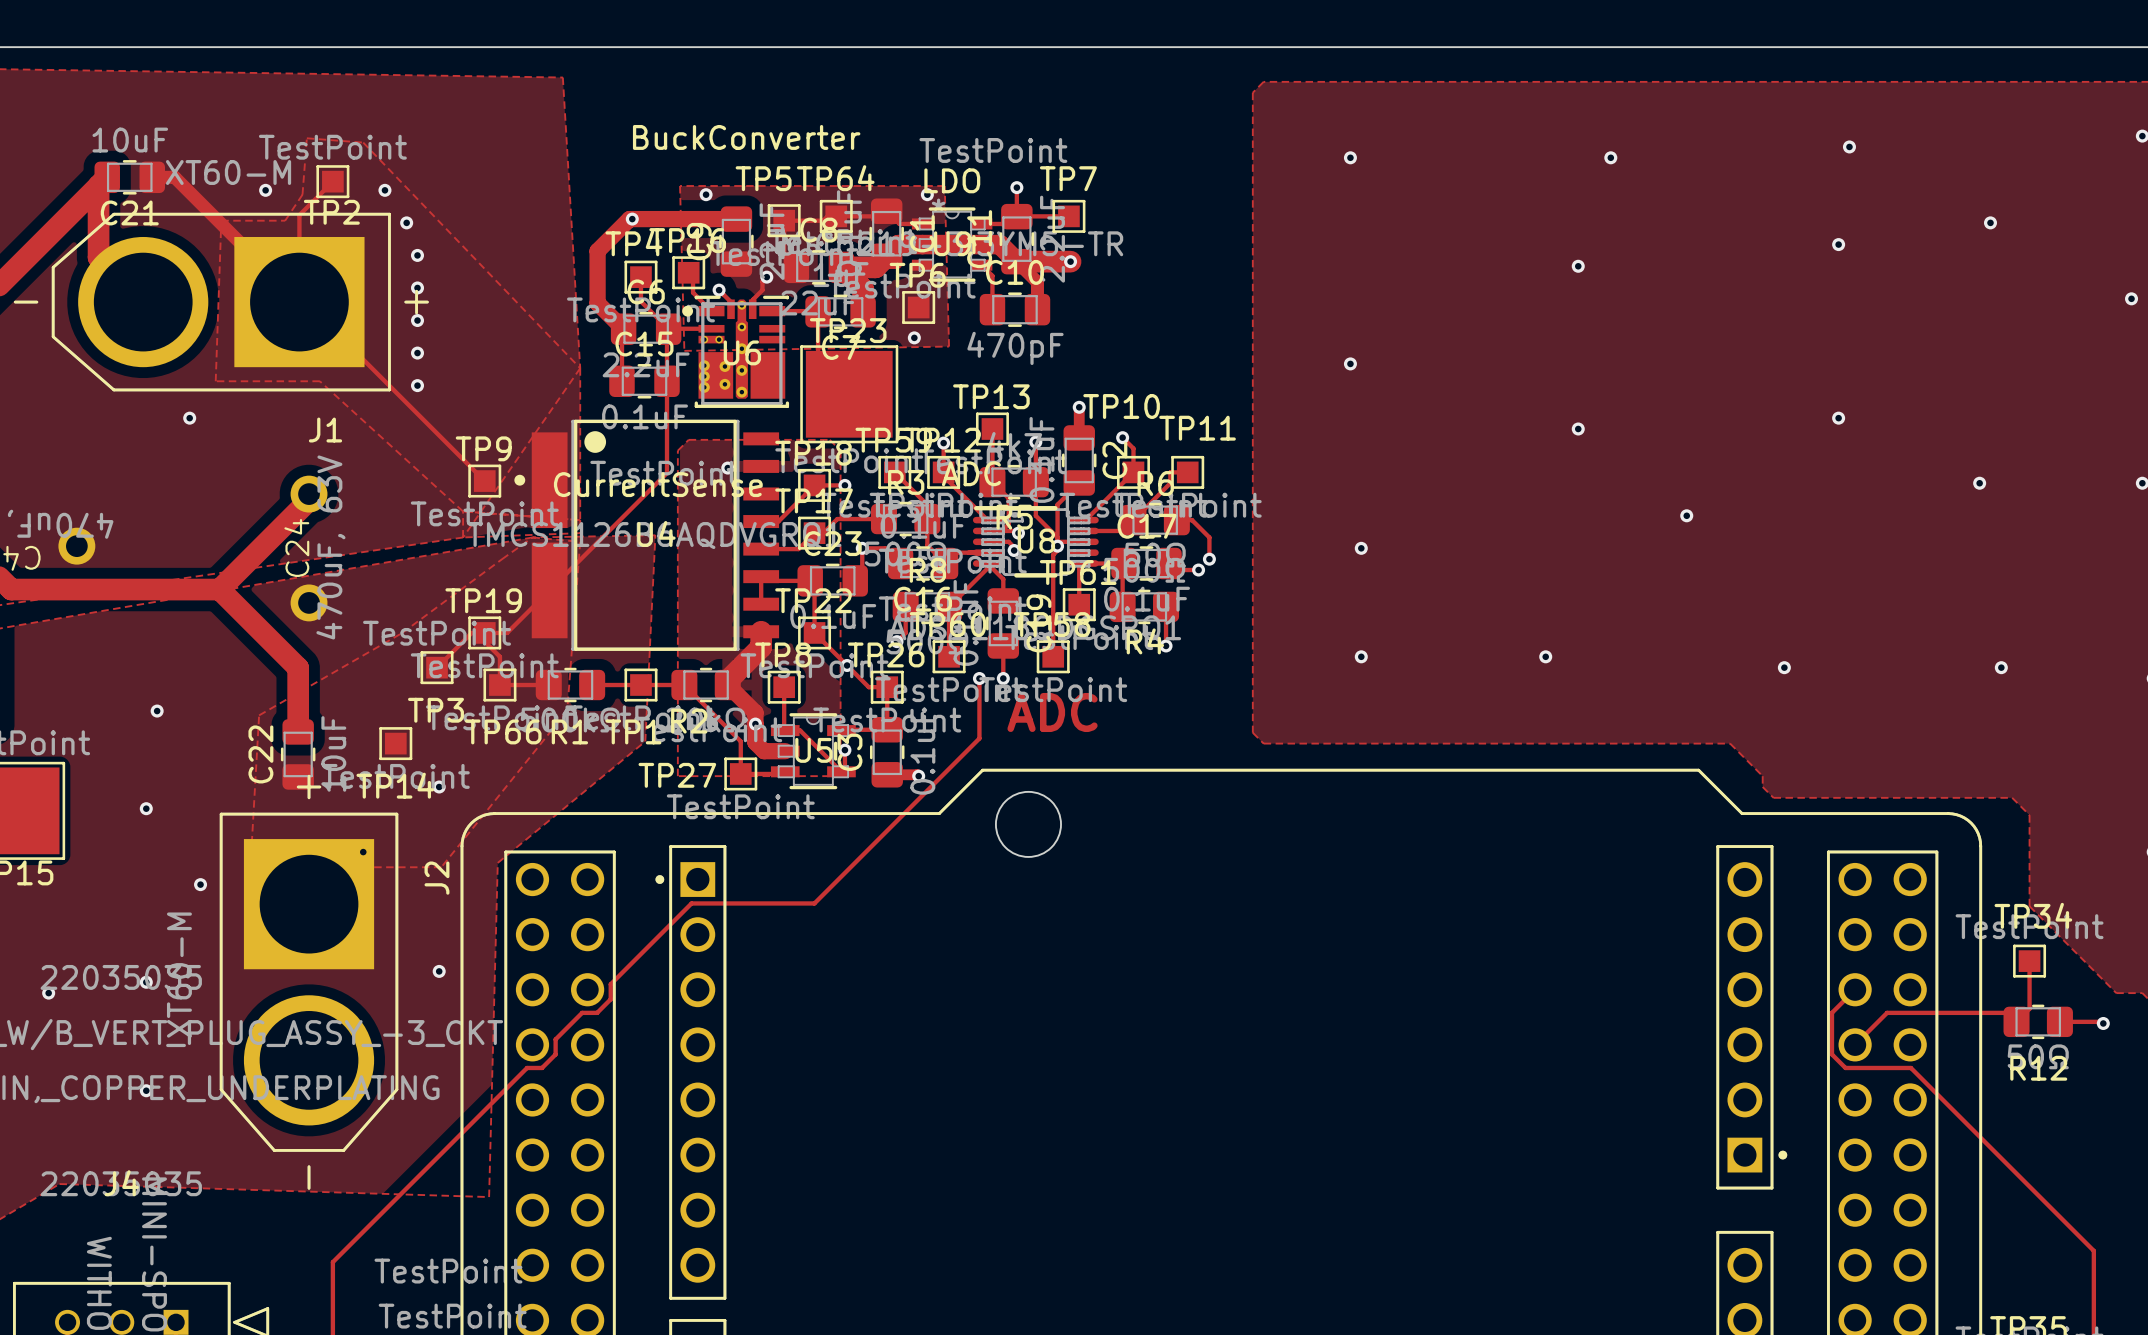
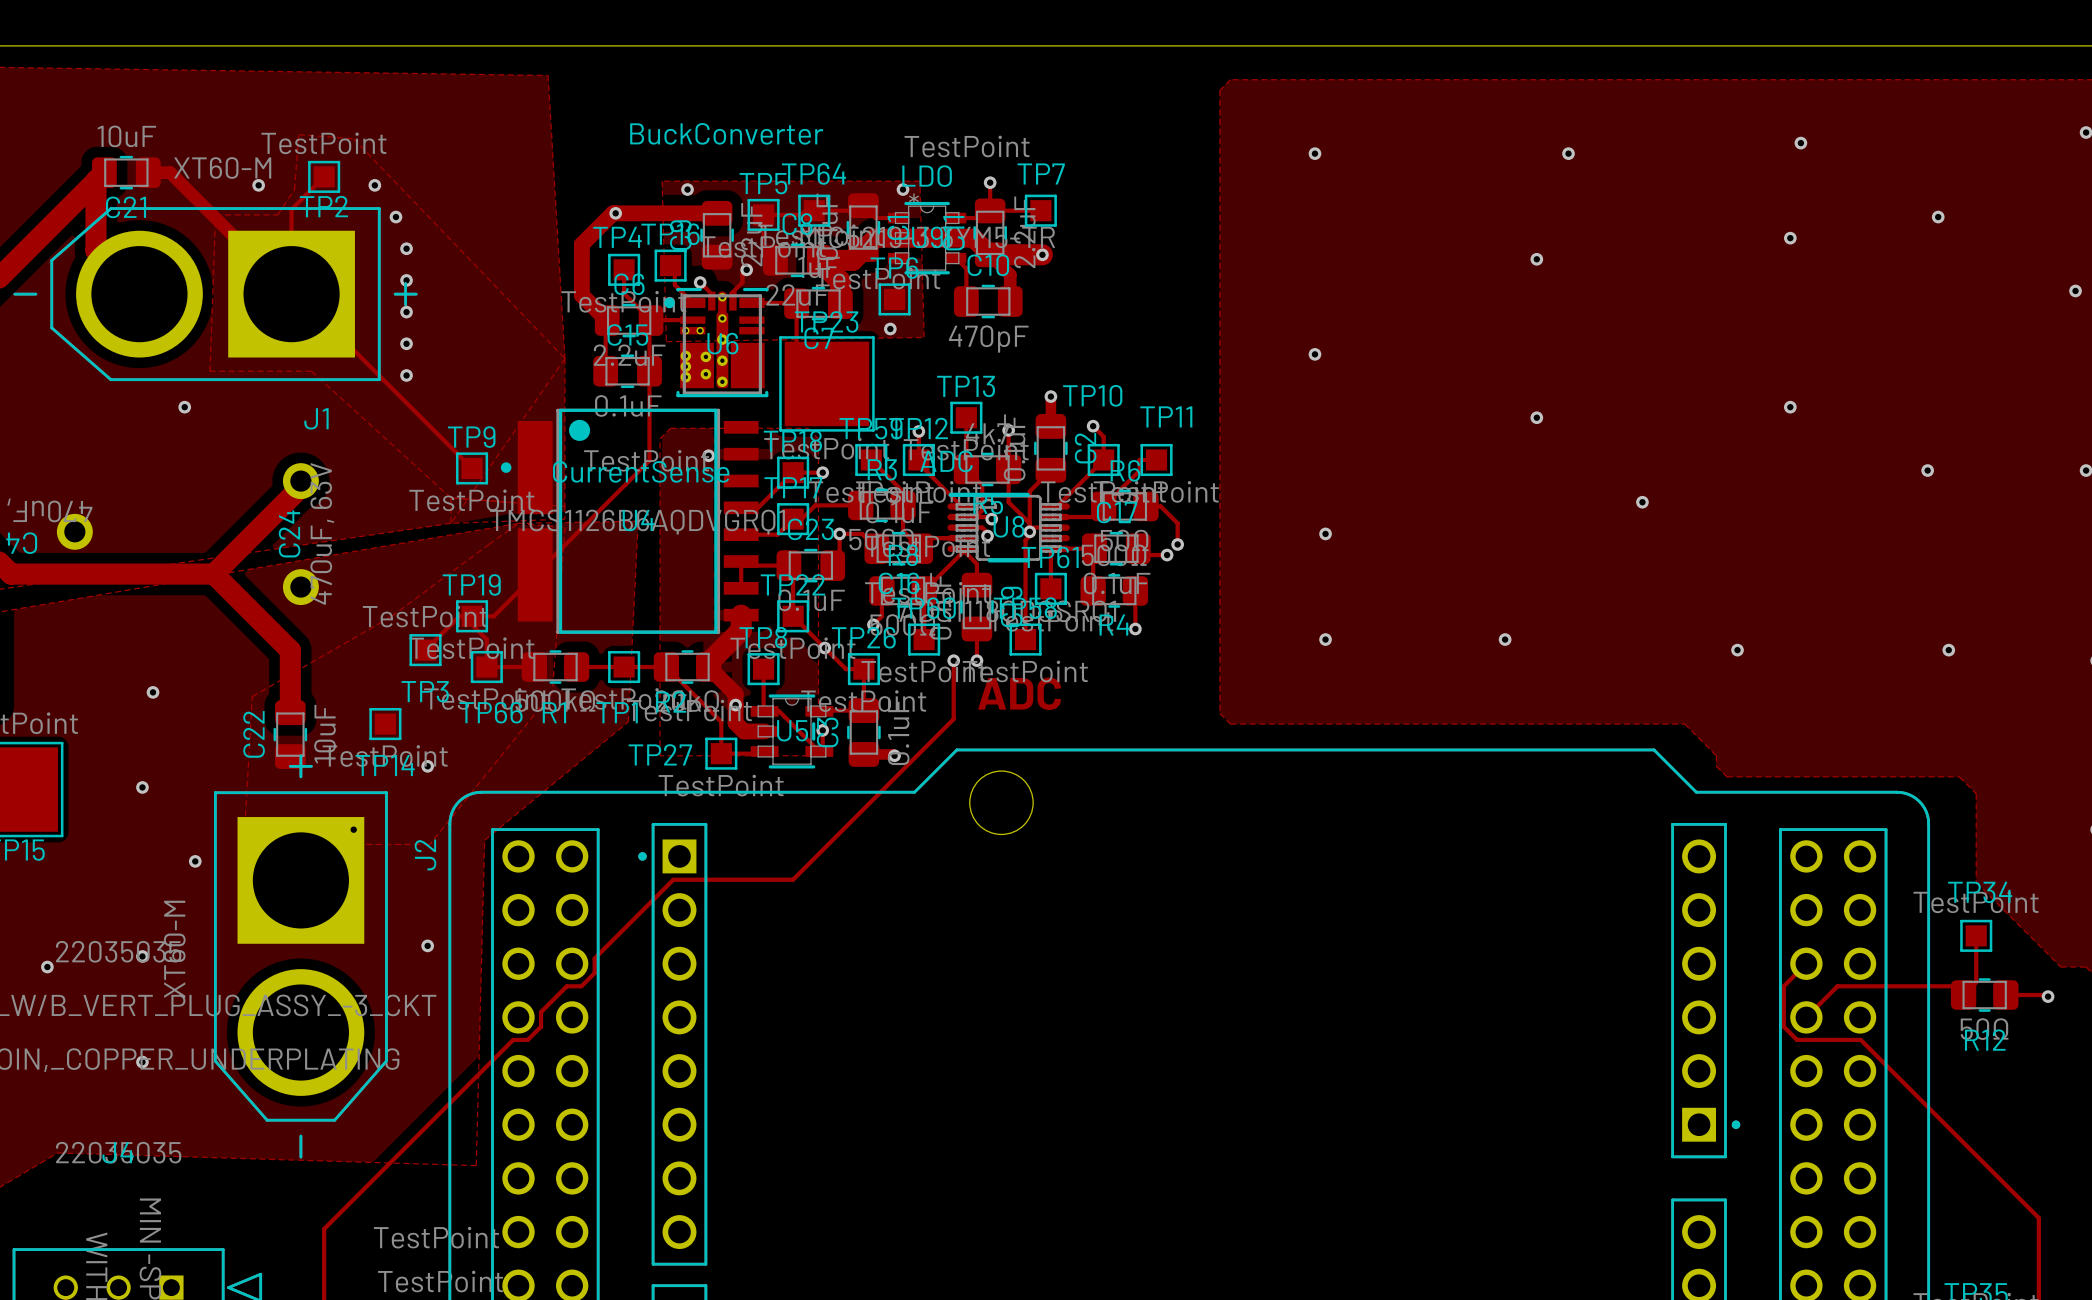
TP5 name position: TP5 (763, 178) -> TP5 (763, 183)

